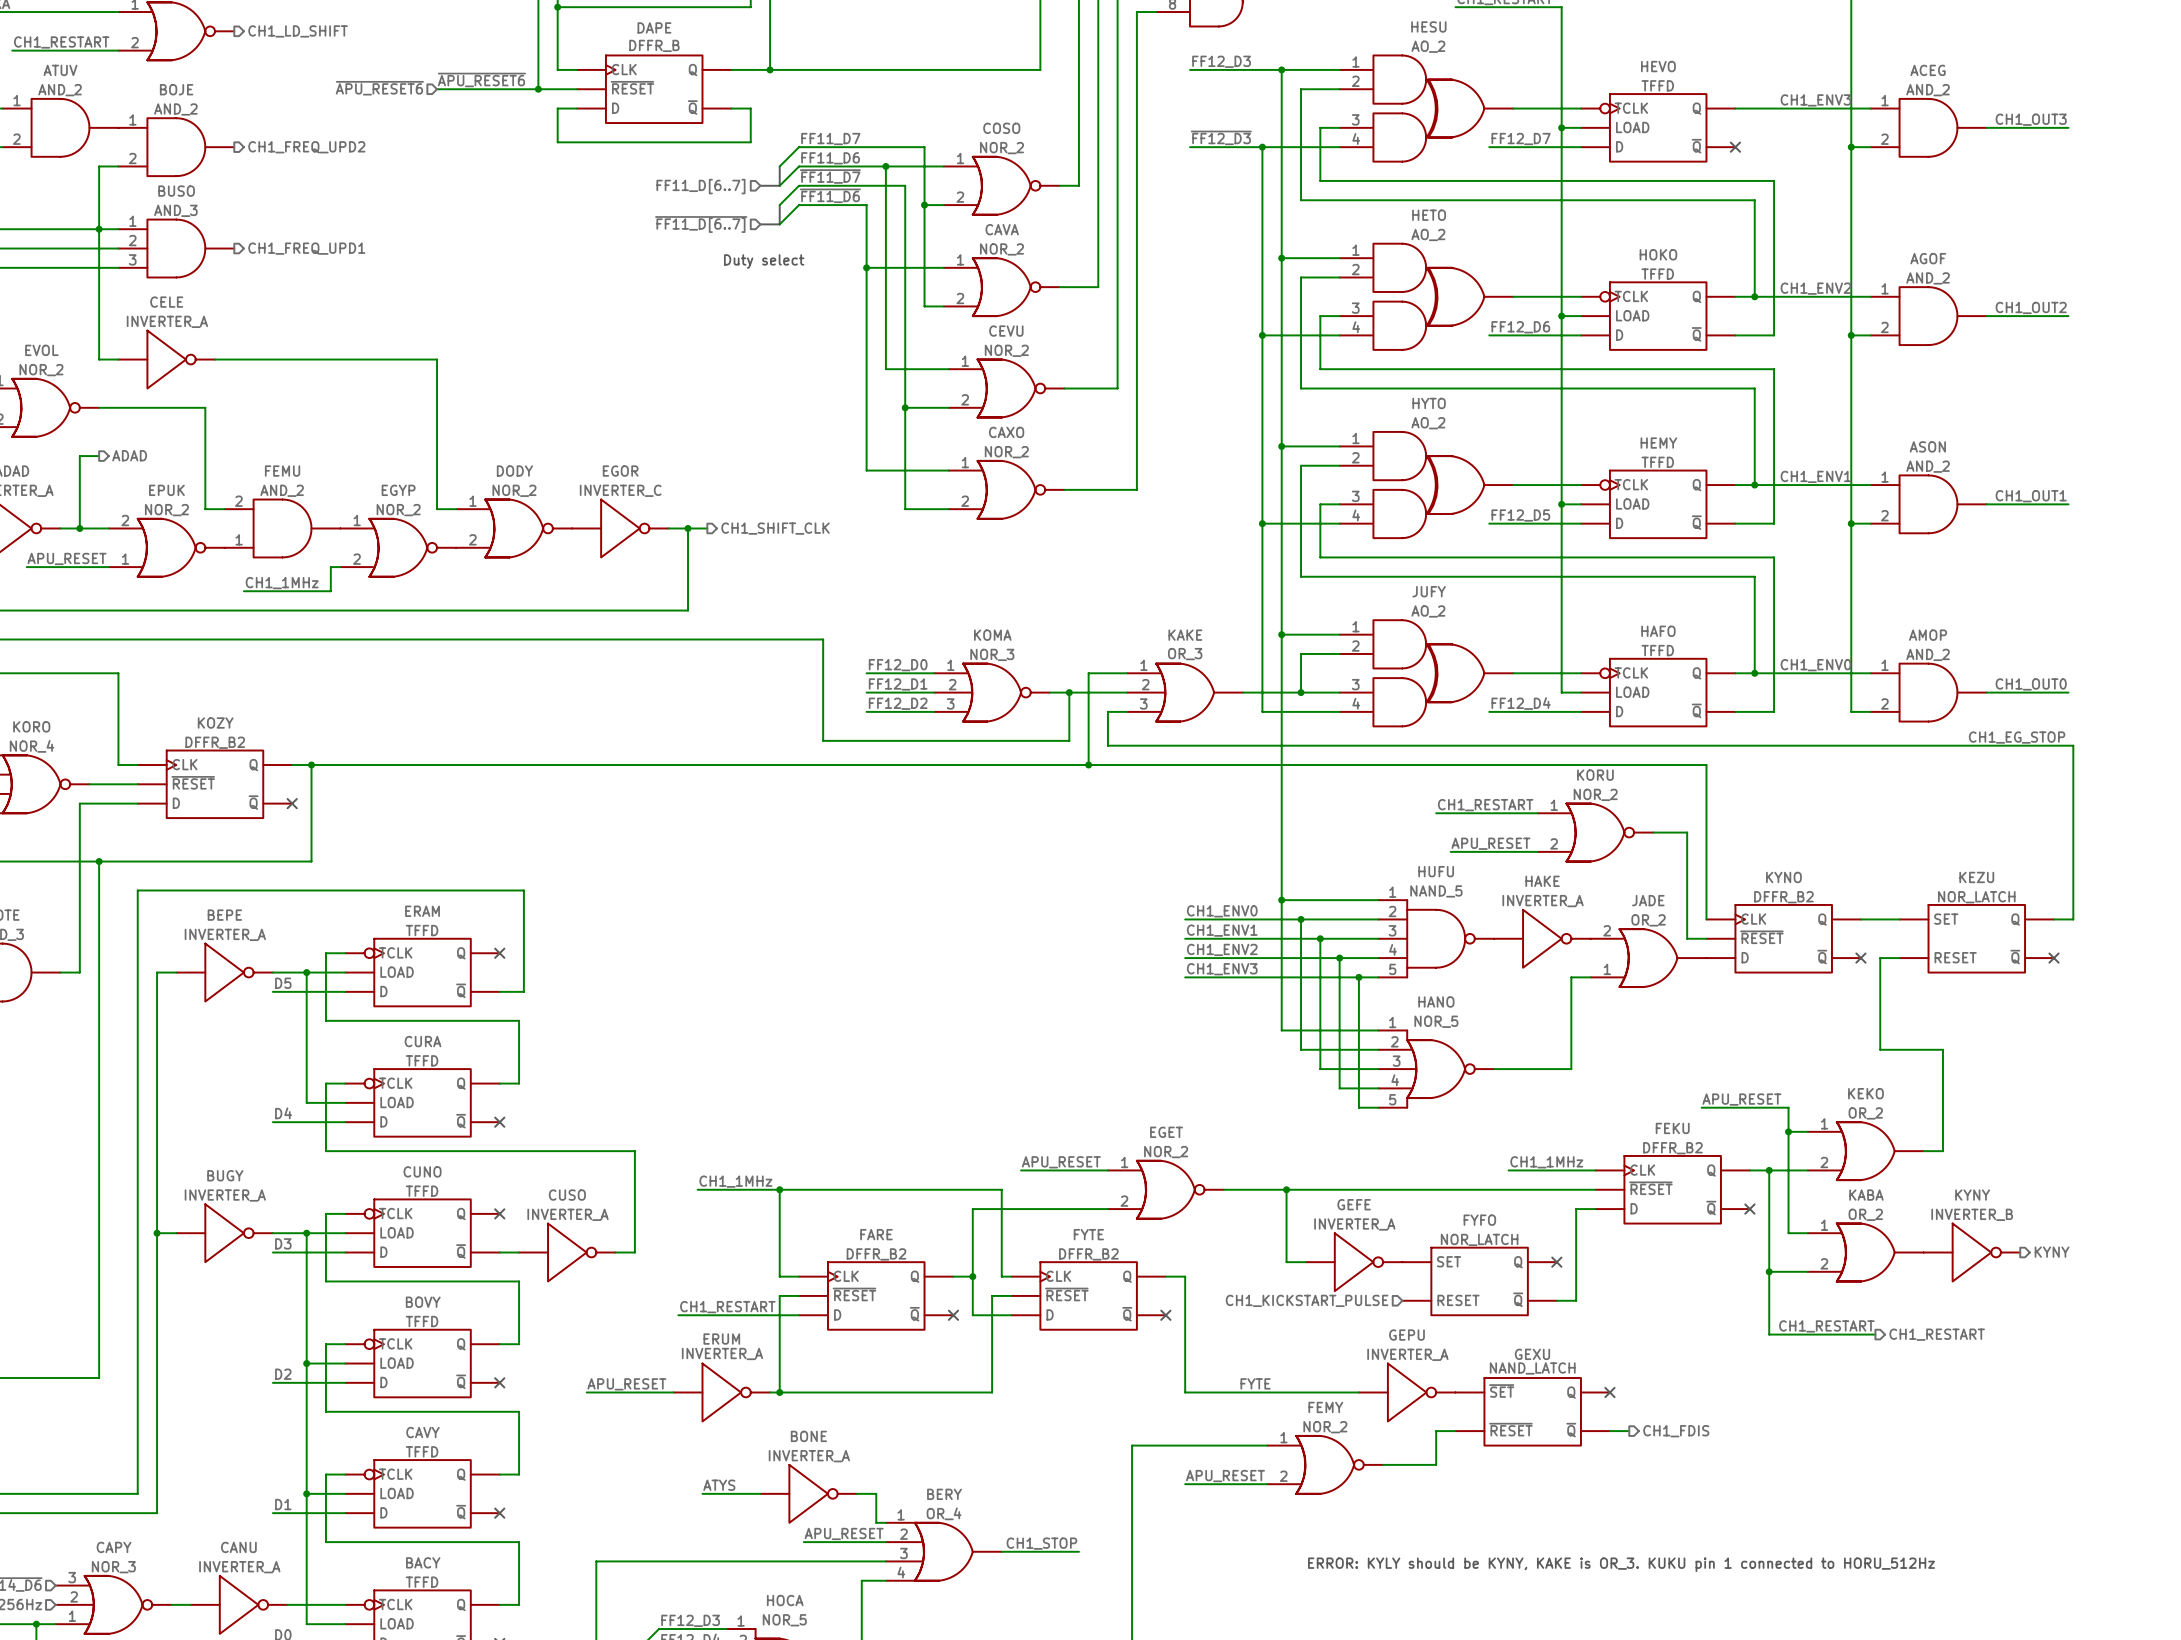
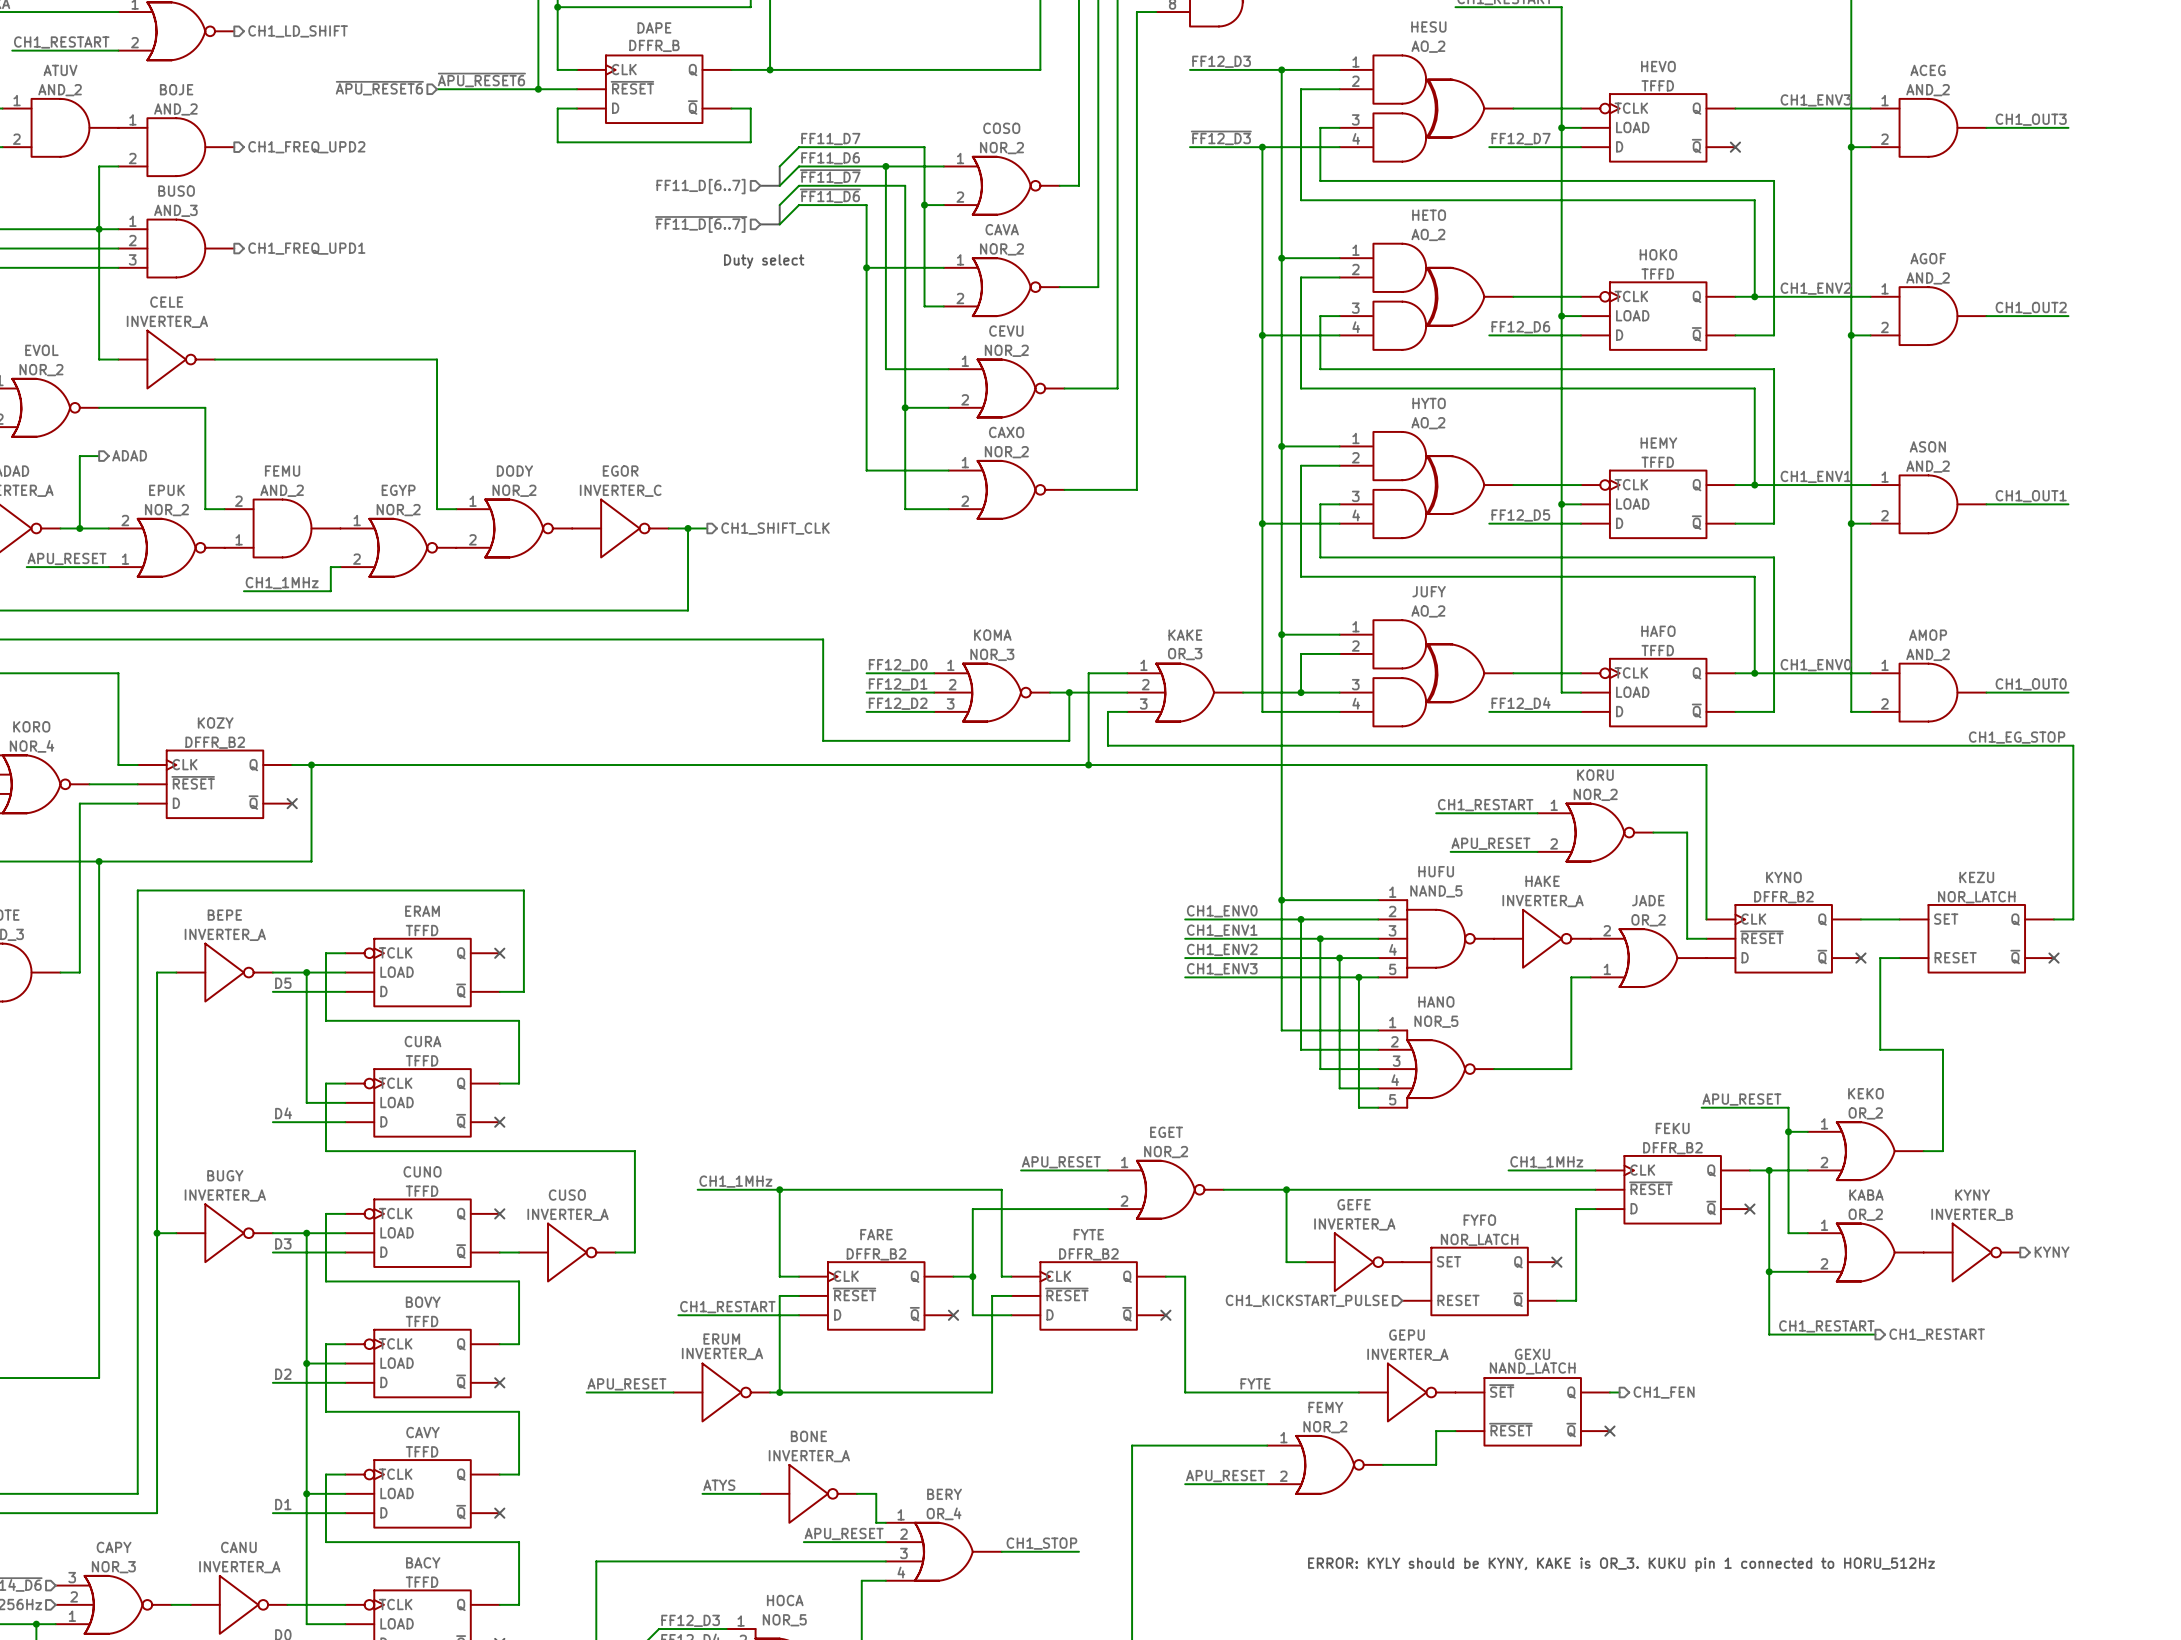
wire: none -> (1609, 1392) (1619, 1392)
no-connect mark position: (1609, 1392) -> (1609, 1431)
hierarchical label: none -> CH1_FEN (1664, 1392)
wire: (1609, 1431) (1629, 1431) -> none
hierarchical label: CH1_FDIS (1676, 1431) -> none

